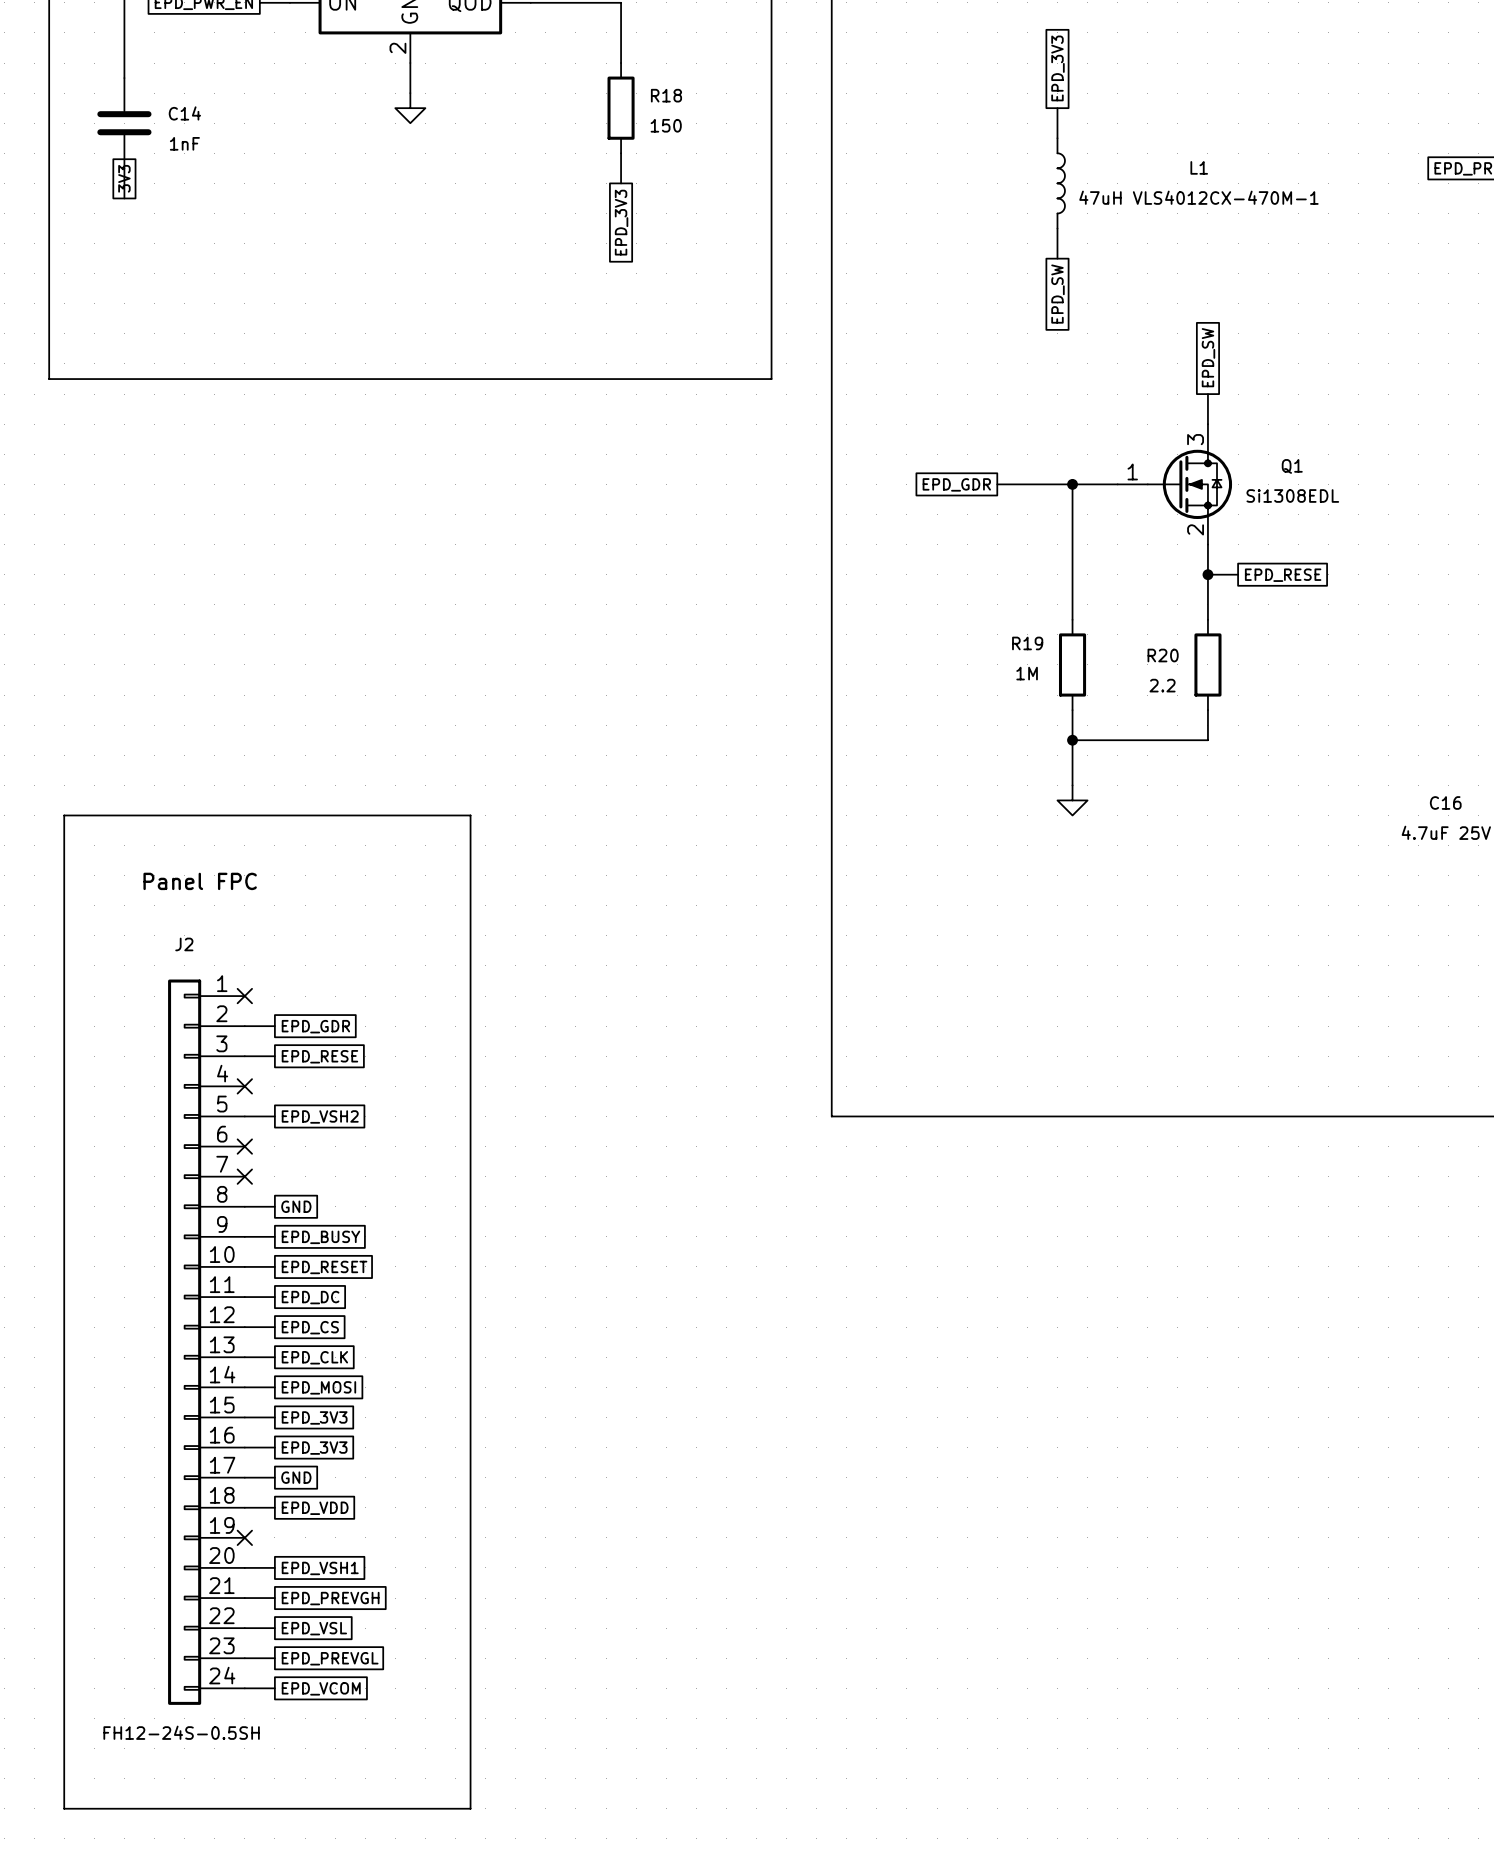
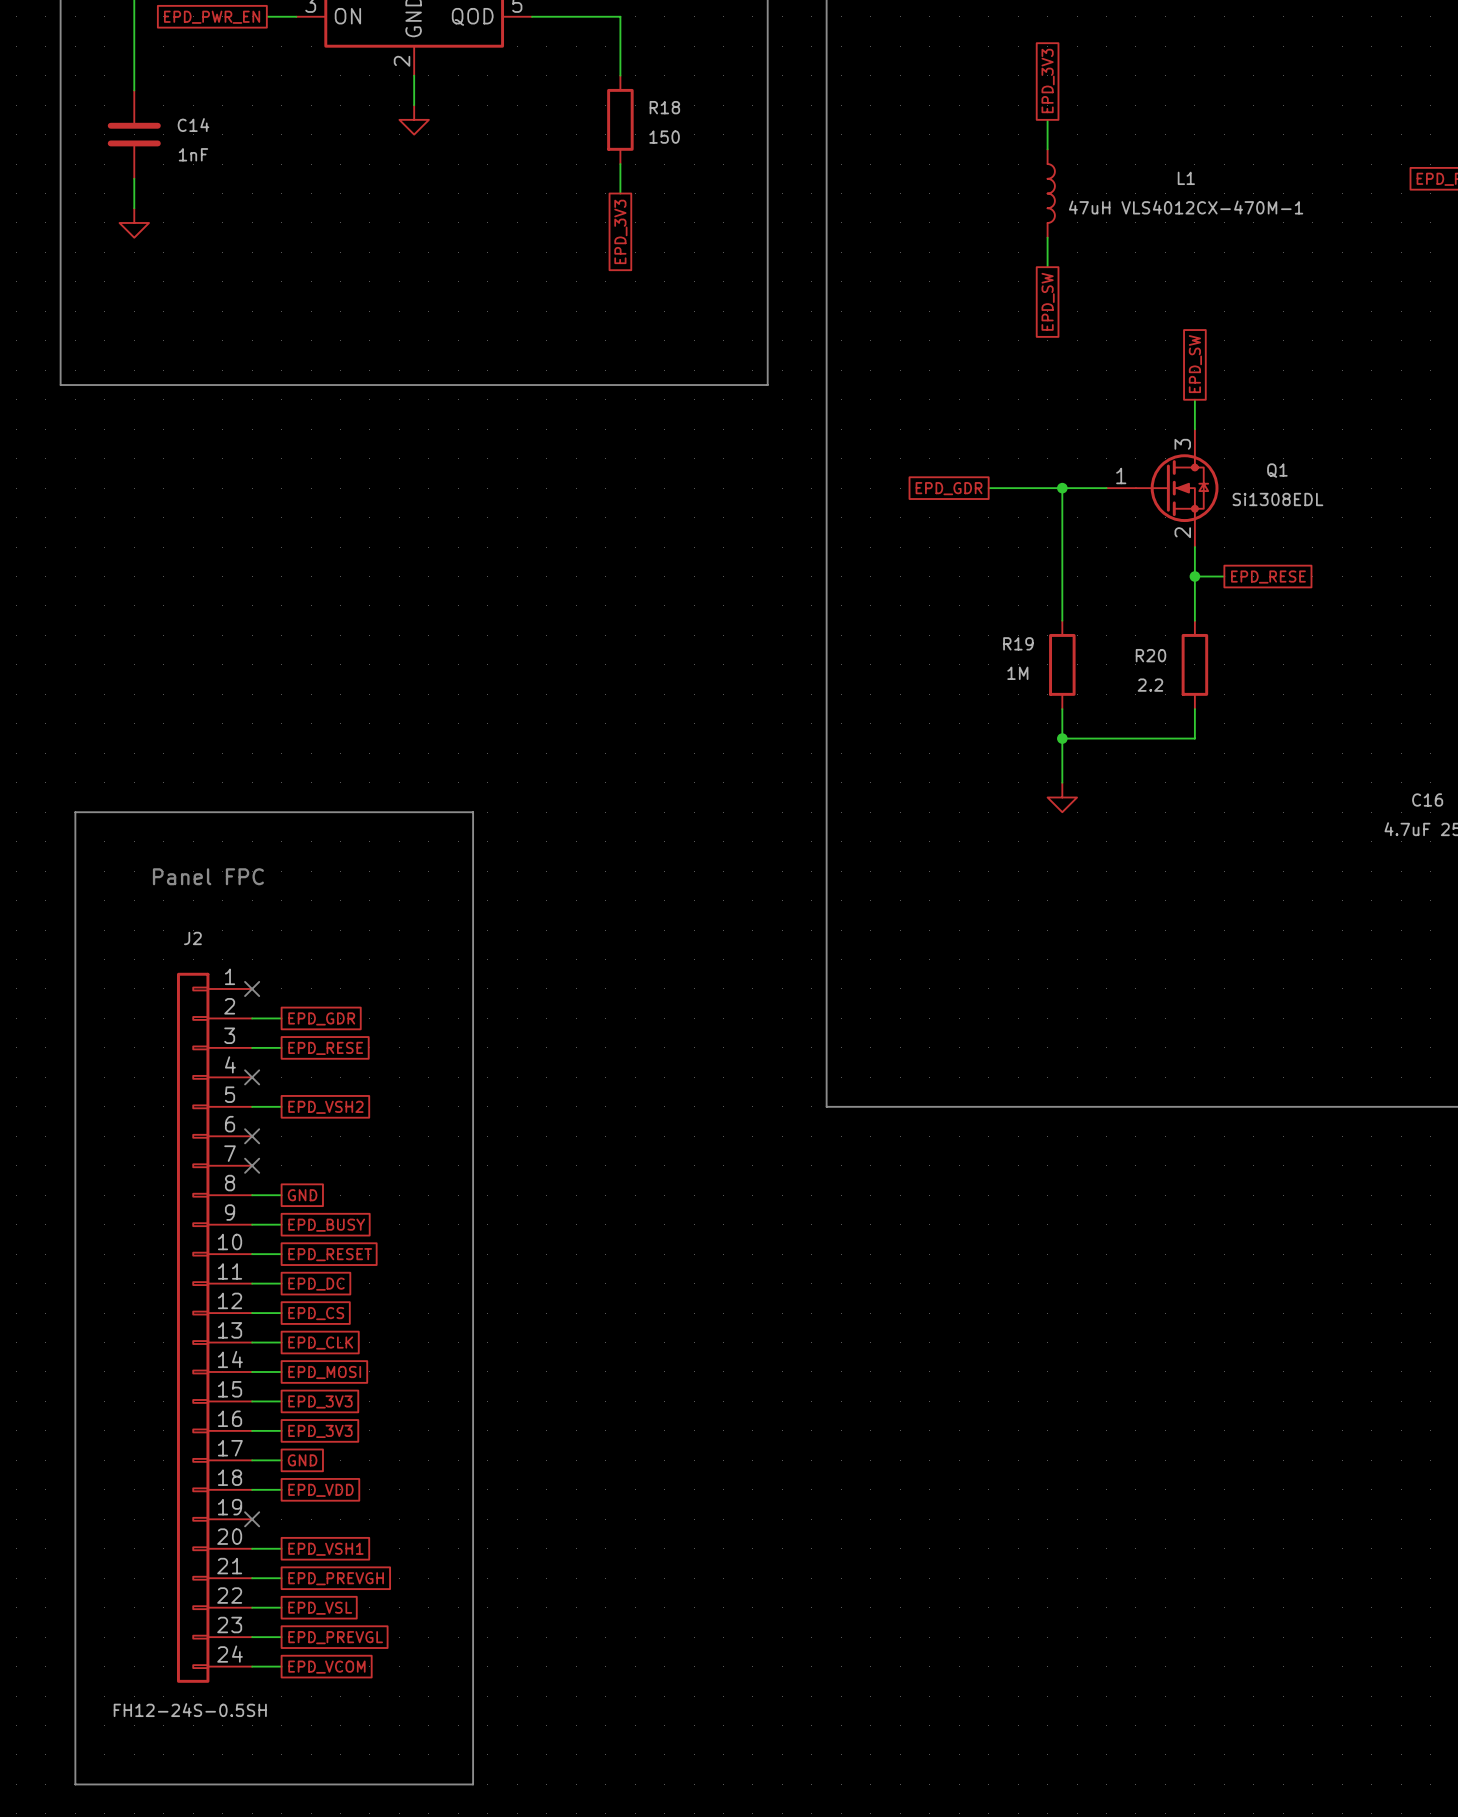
global label: 3V3 (124, 178) -> none
power symbol: none -> (134, 222)

